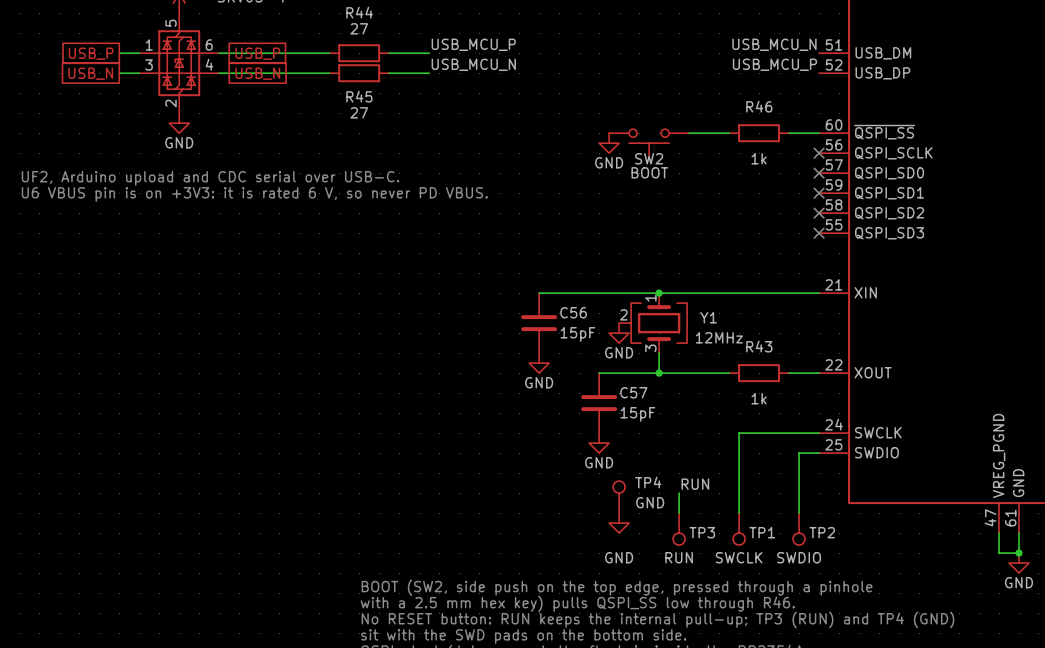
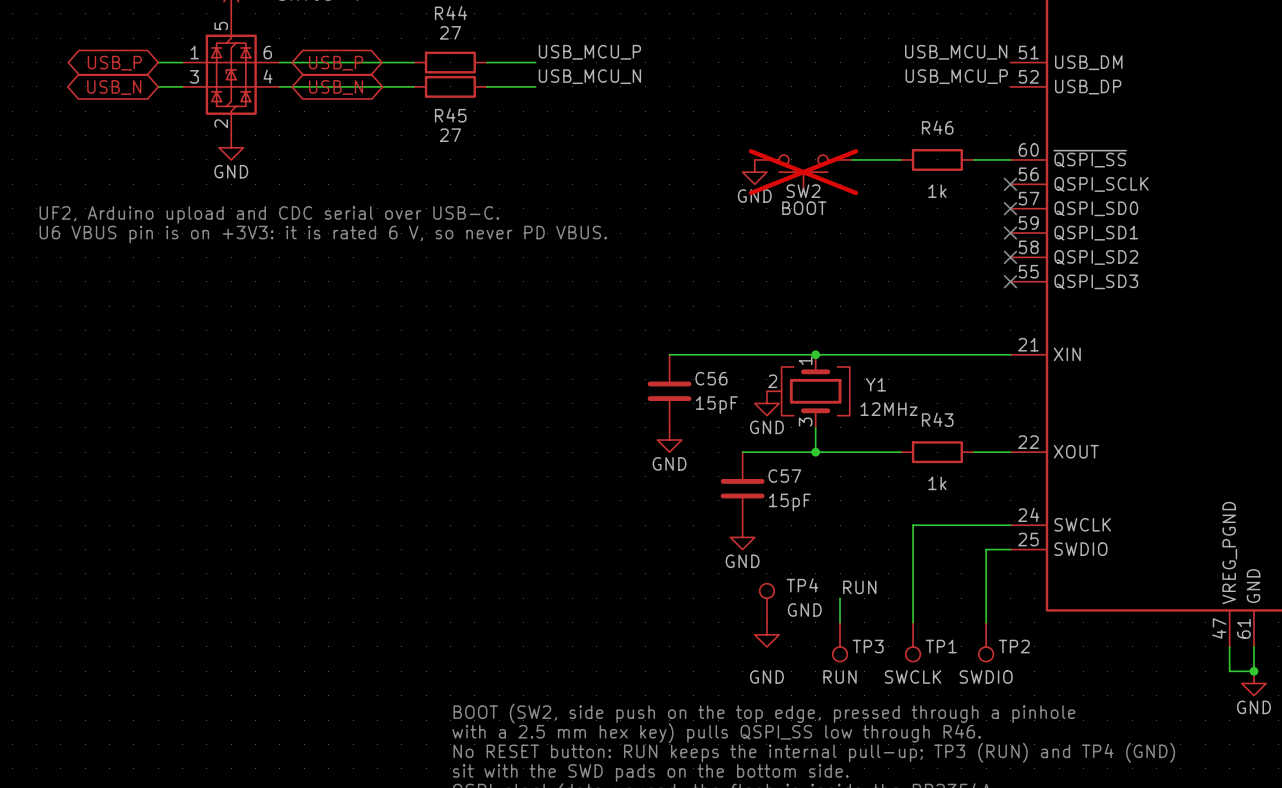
global label shape: passive (91, 53) -> bidirectional (114, 63)
global label shape: passive (257, 53) -> bidirectional (336, 63)
global label shape: passive (90, 73) -> bidirectional (114, 87)
global label shape: passive (257, 73) -> bidirectional (336, 87)
SW2 do-not-place cross: none -> (803, 172)

